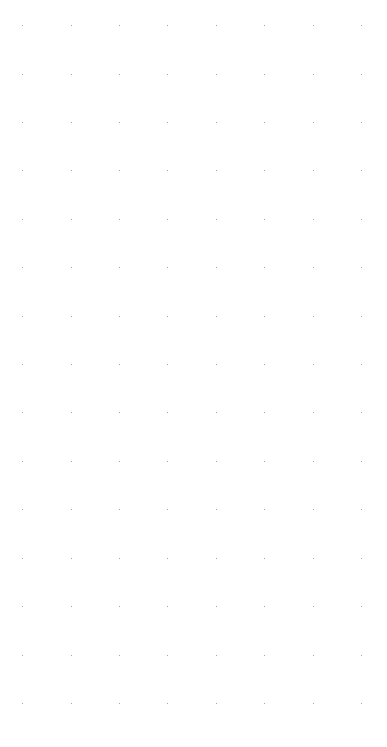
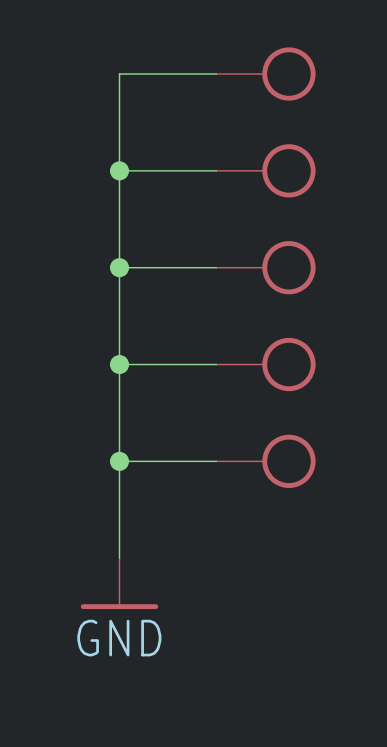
wire: none -> (216, 74) (119, 74) (119, 558)
part: none -> (265, 74)
wire: none -> (119, 170) (216, 170)
junction: none -> (119, 170)
part: none -> (265, 170)
wire: none -> (119, 267) (216, 267)
junction: none -> (119, 267)
part: none -> (265, 267)
wire: none -> (119, 364) (216, 364)
junction: none -> (119, 364)
part: none -> (265, 364)
wire: none -> (119, 461) (216, 461)
junction: none -> (119, 461)
part: none -> (265, 461)
power symbol: none -> GND (119, 583)

